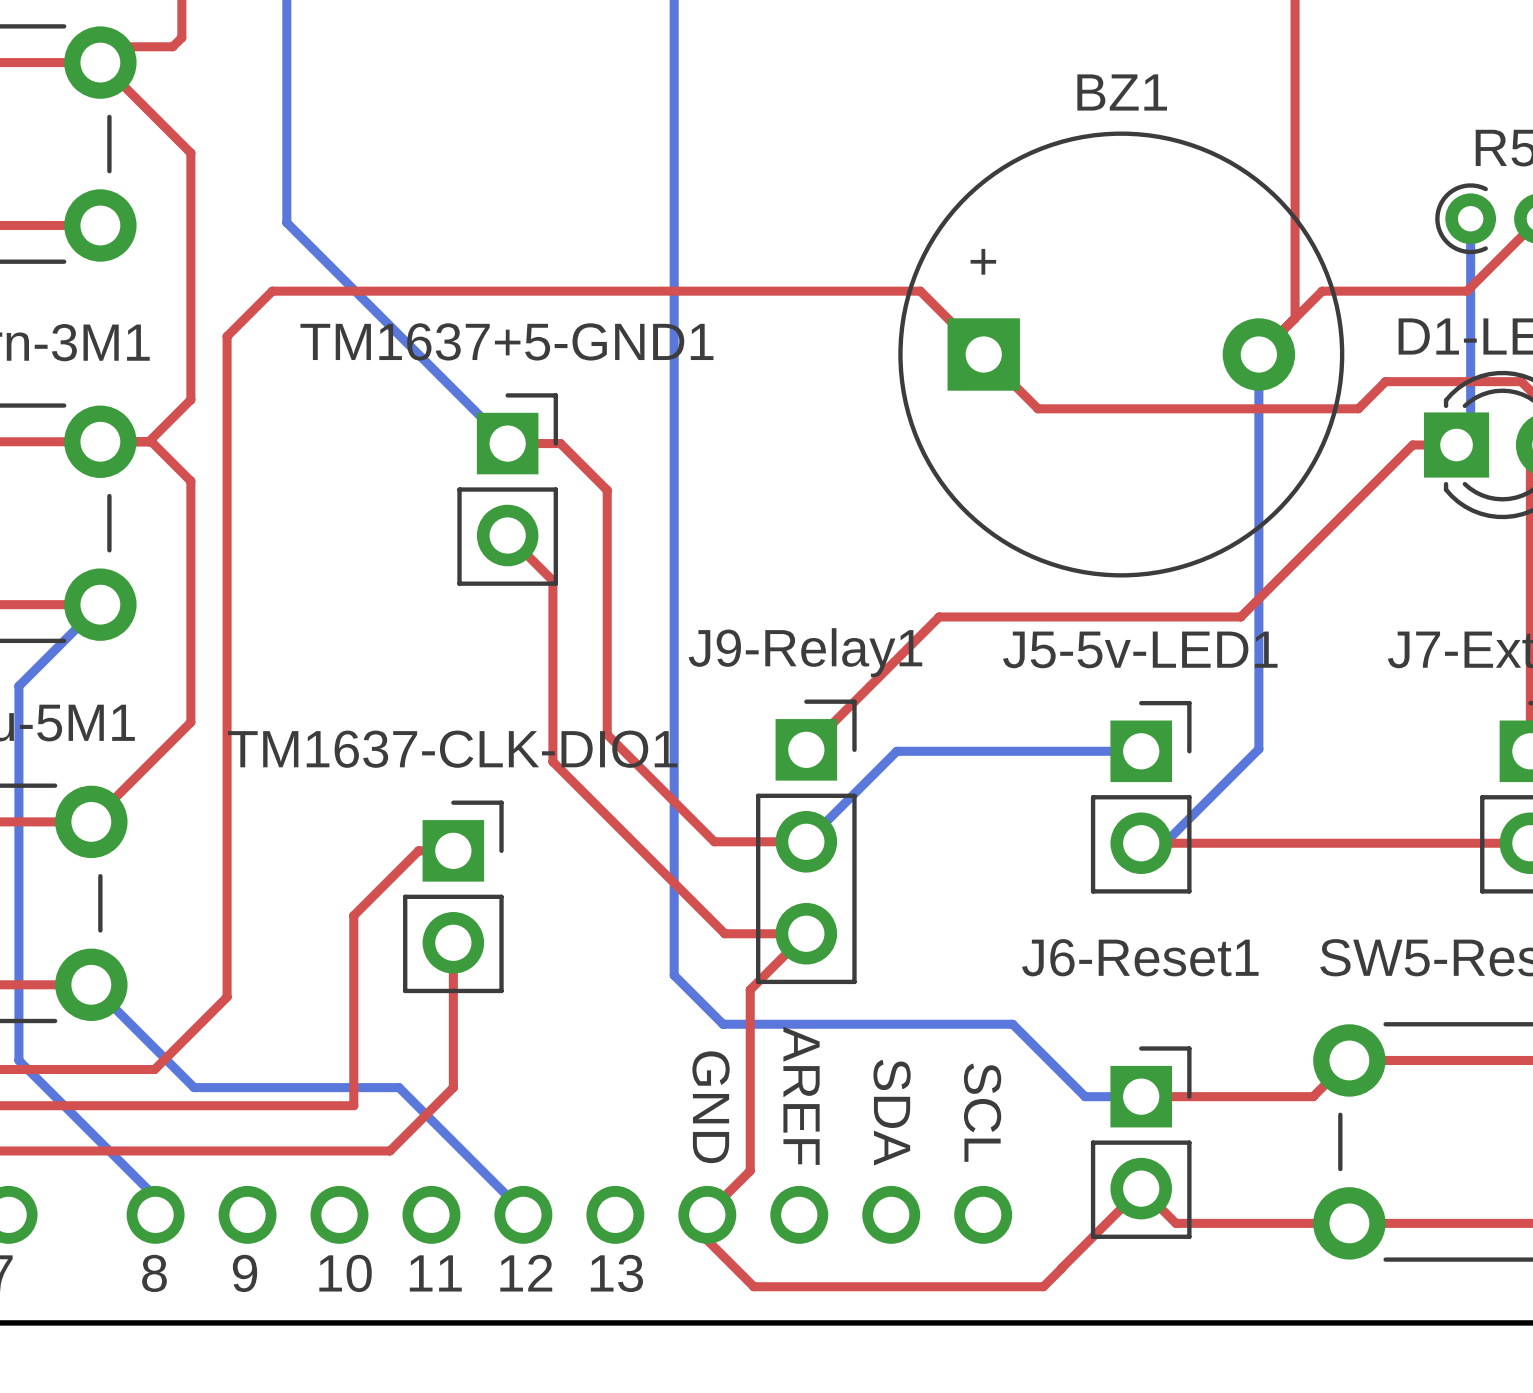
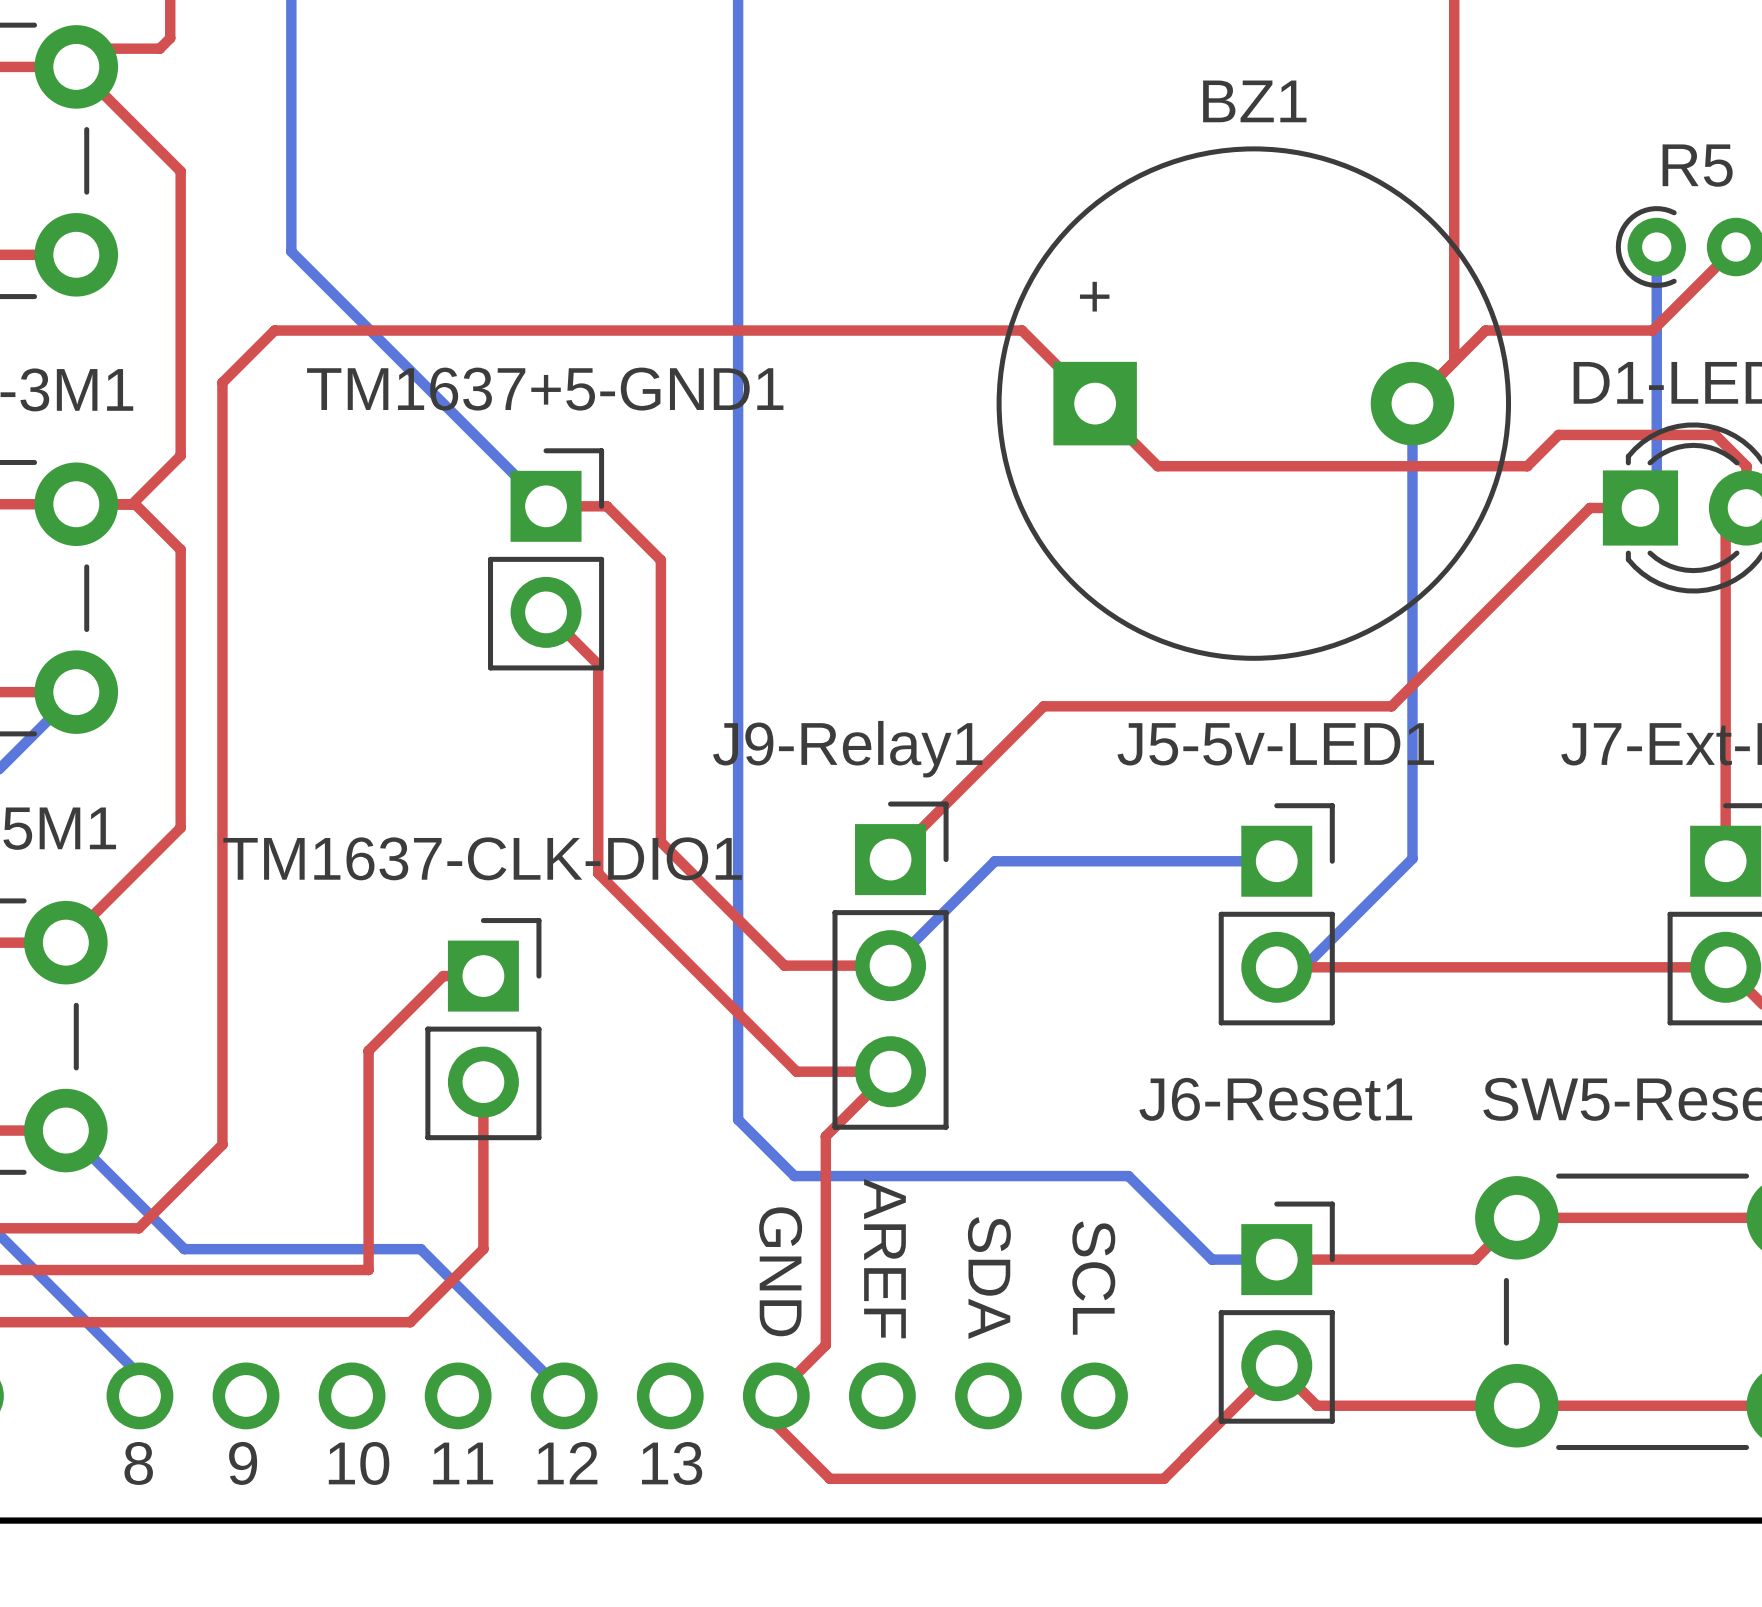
J9-Relay1 name position: J9-Relay1 (805, 652) -> J9-Relay1 (847, 749)

